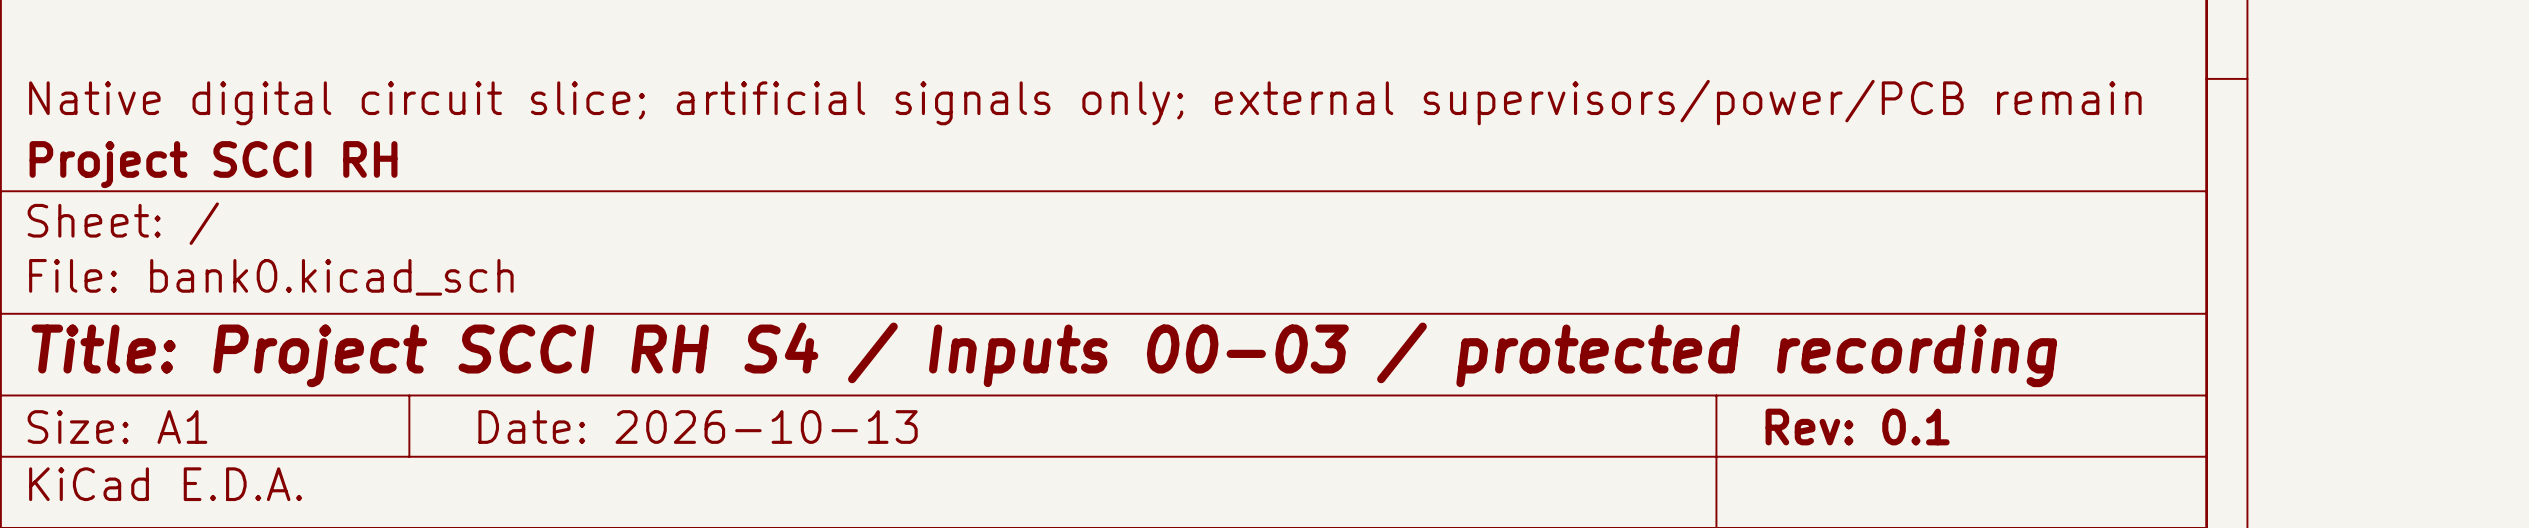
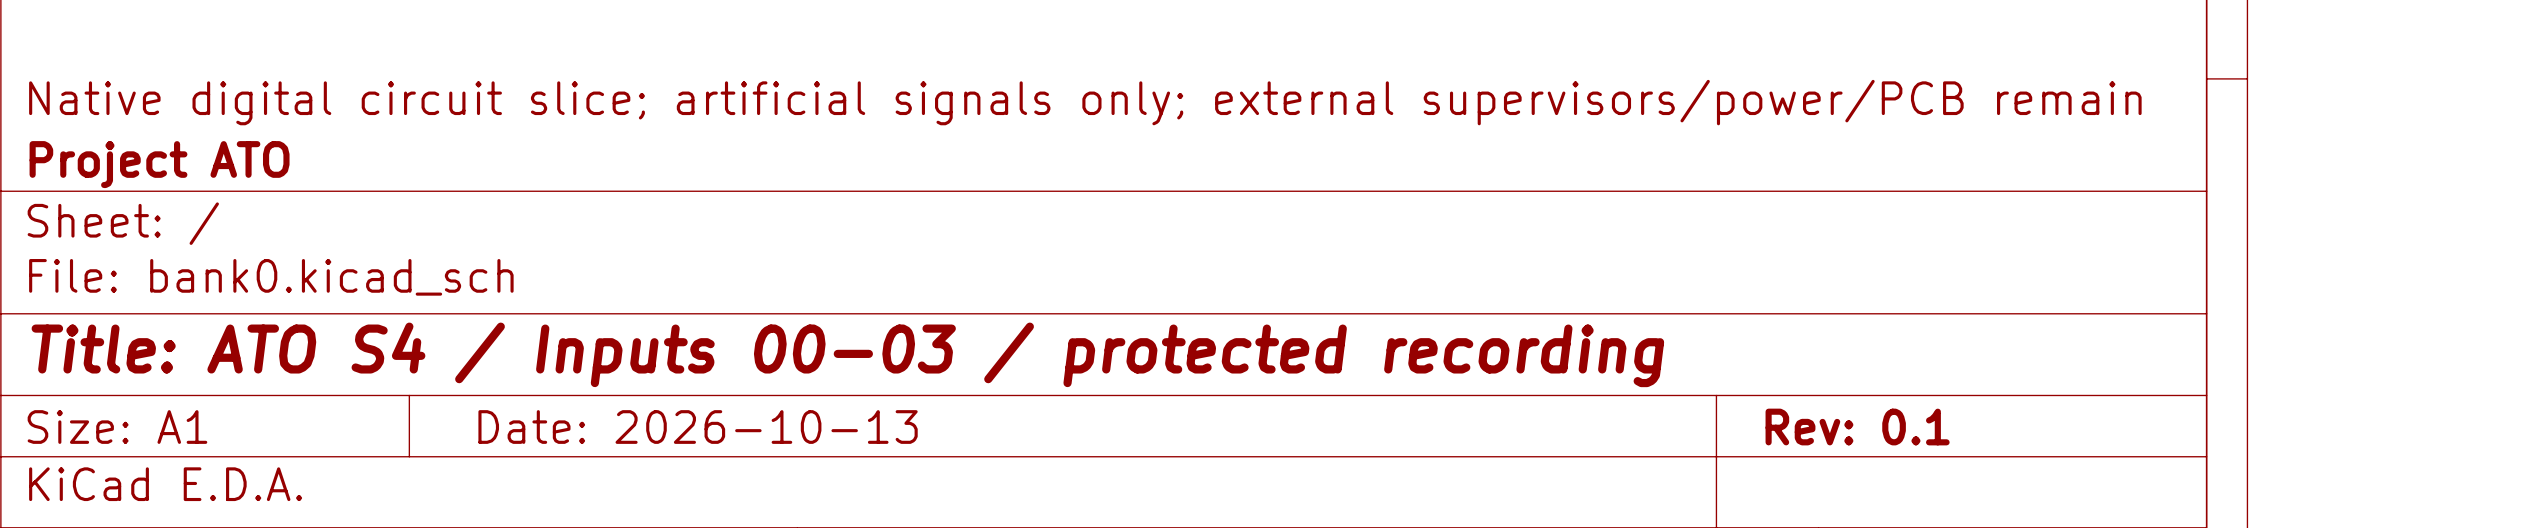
title block: Project SCCI RH (213, 164) -> Project ATO (159, 164)
title block: Title: Project SCCI RH S4 / Inputs 00-03 / protected recording (1044, 354) -> Title: ATO S4 / Inputs 00-03 / protected recording (847, 354)

